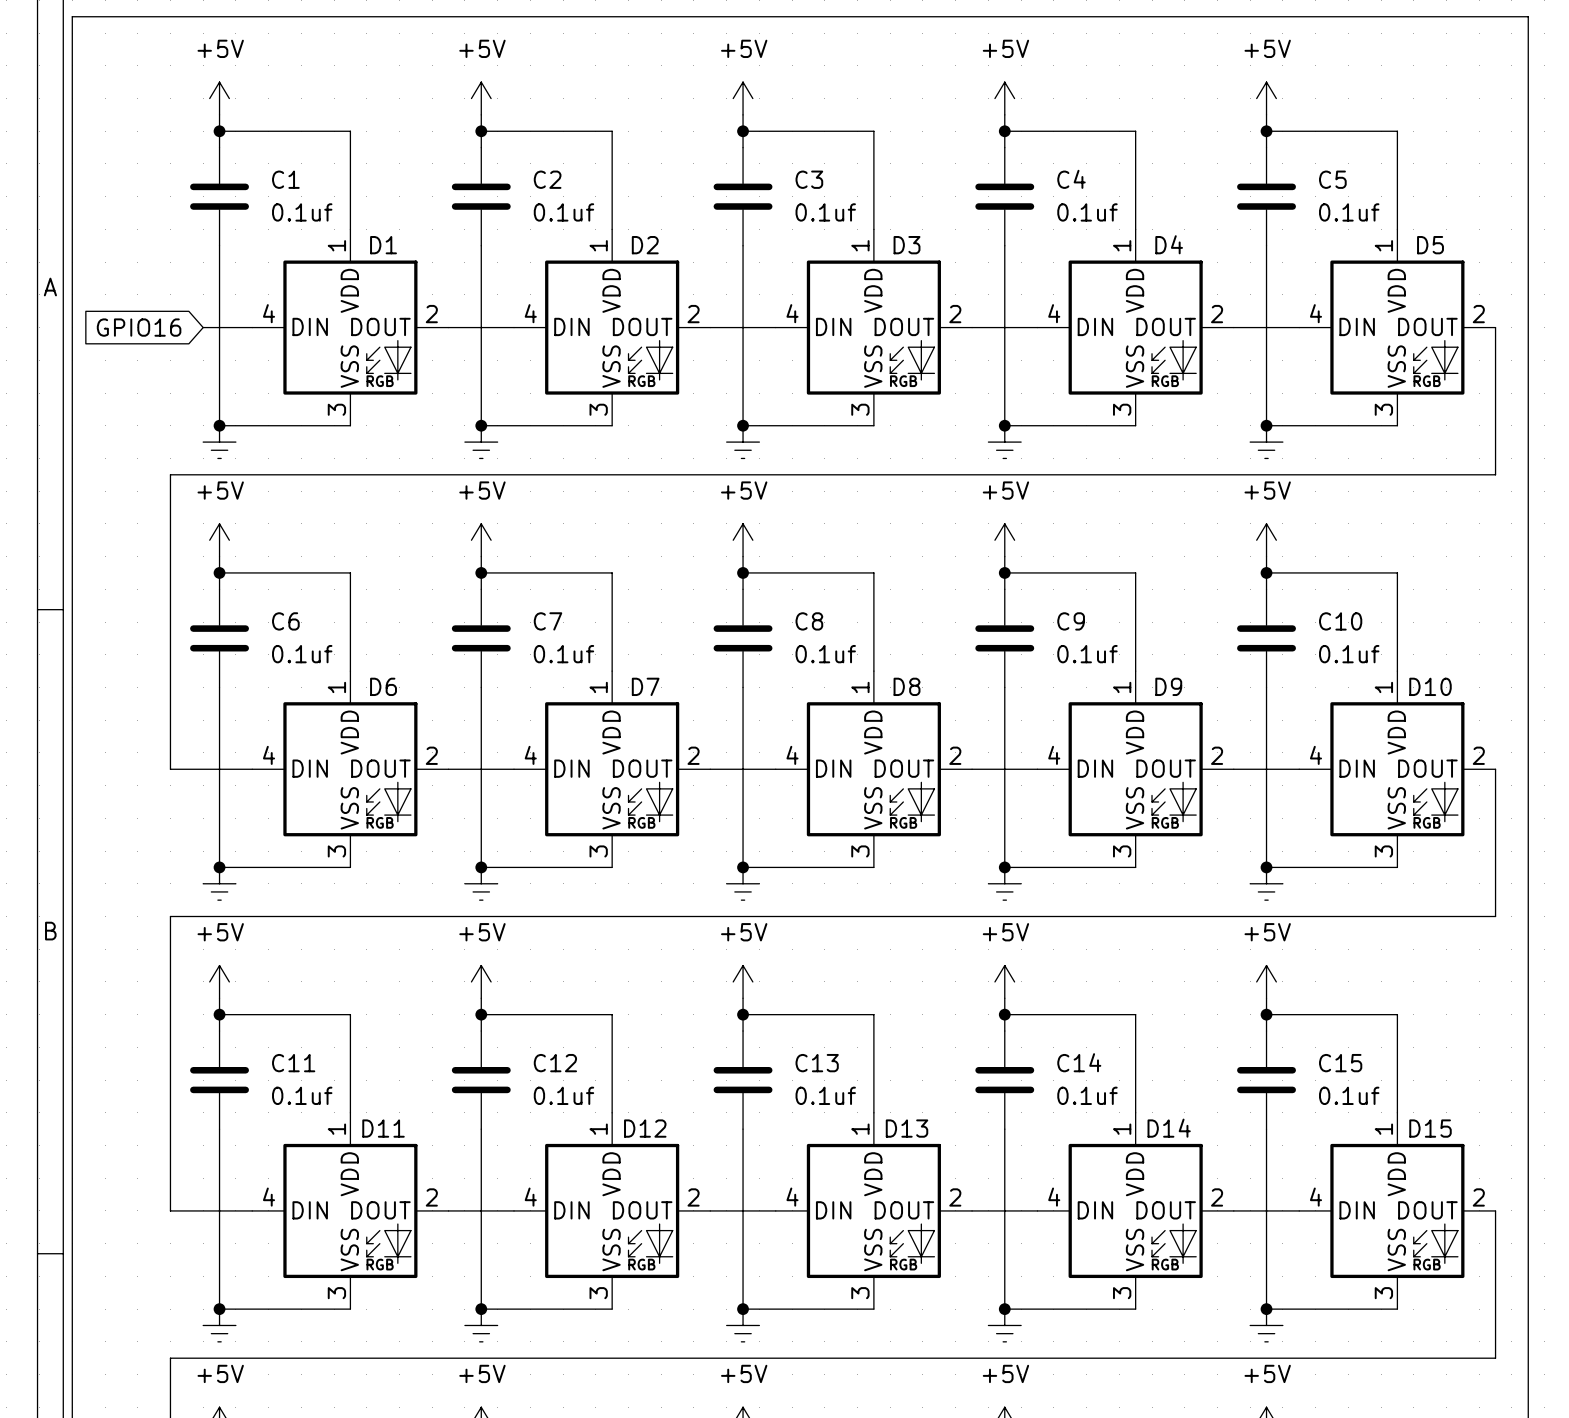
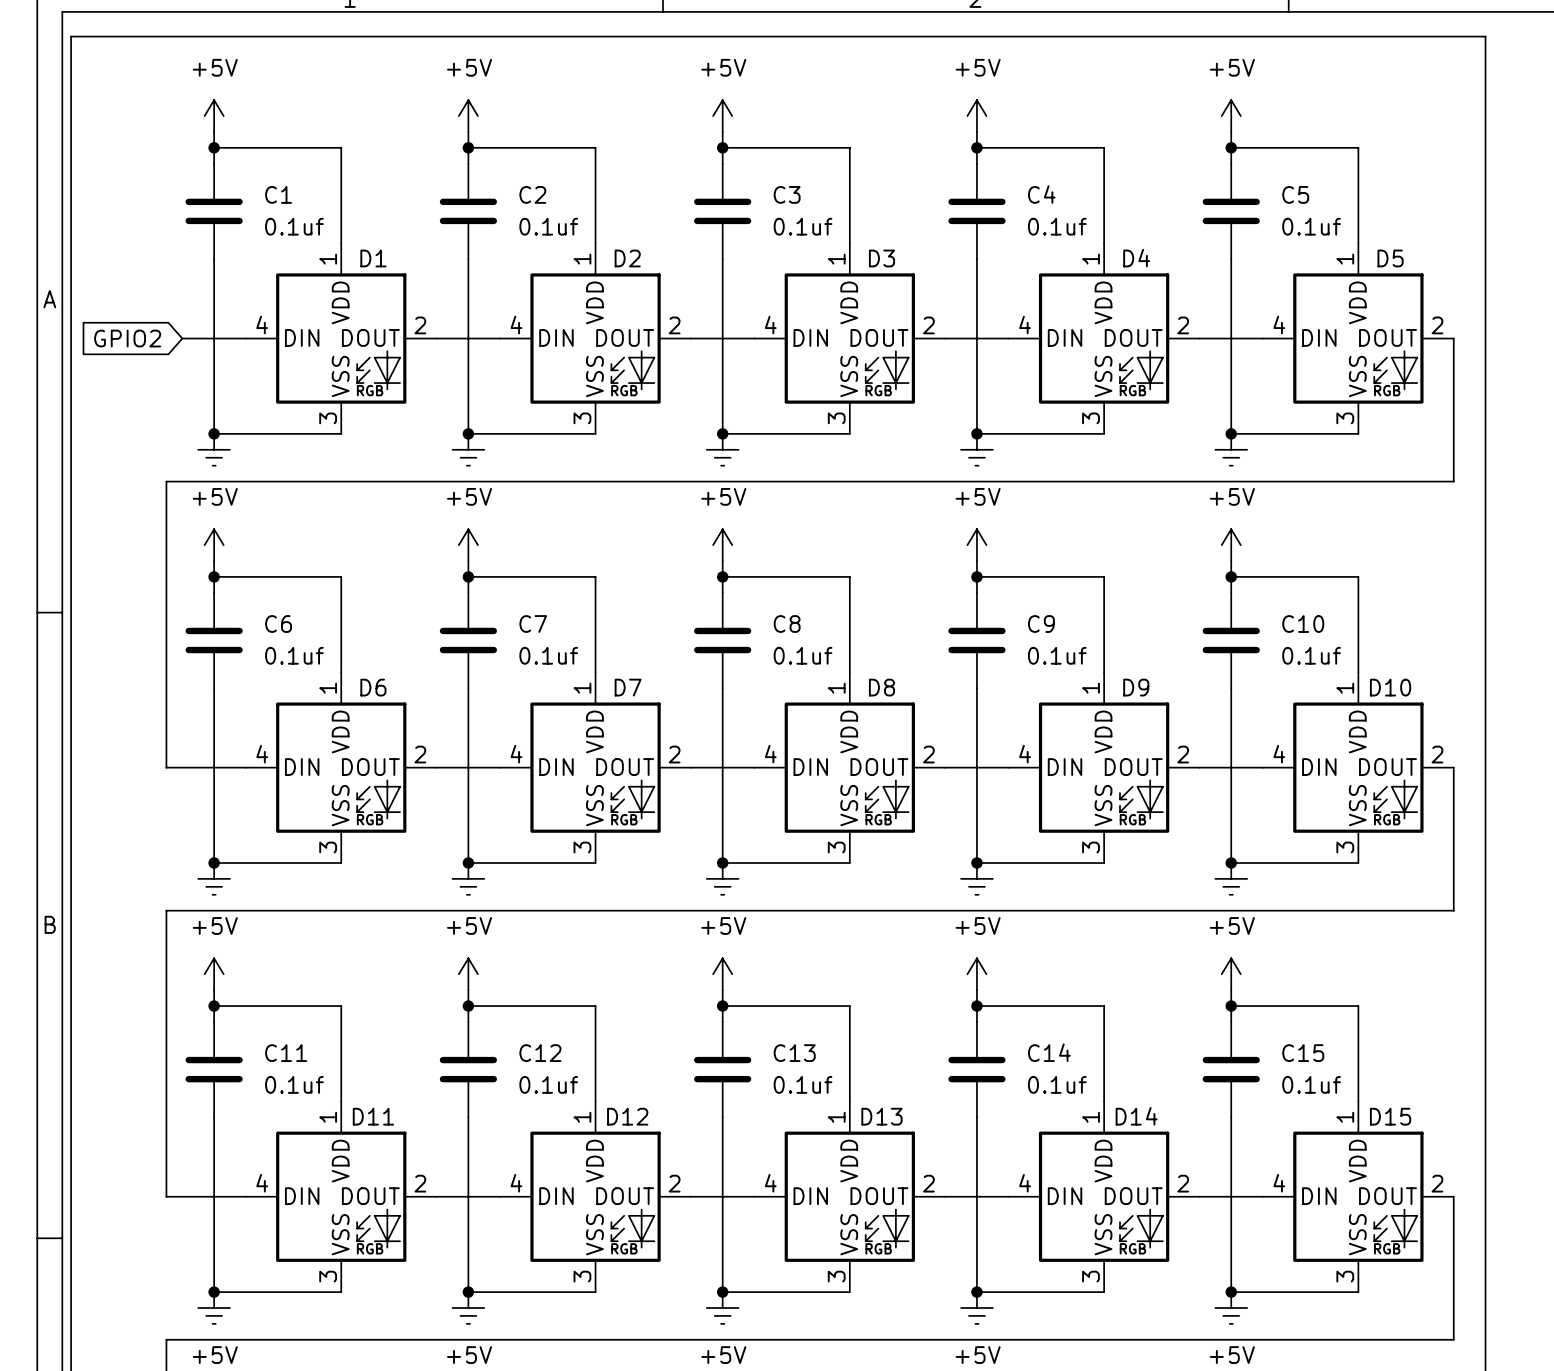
global label: GPIO16 (139, 327) -> GPIO2 (127, 338)
wire: none -> (182, 338) (198, 338)

